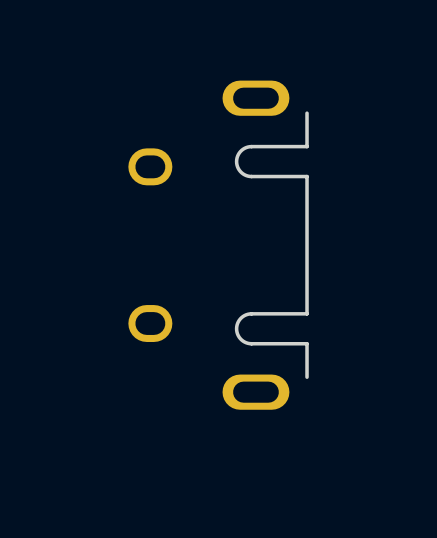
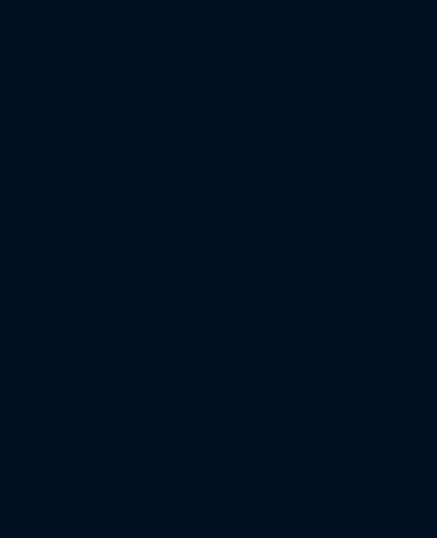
part: (218, 245) -> none

